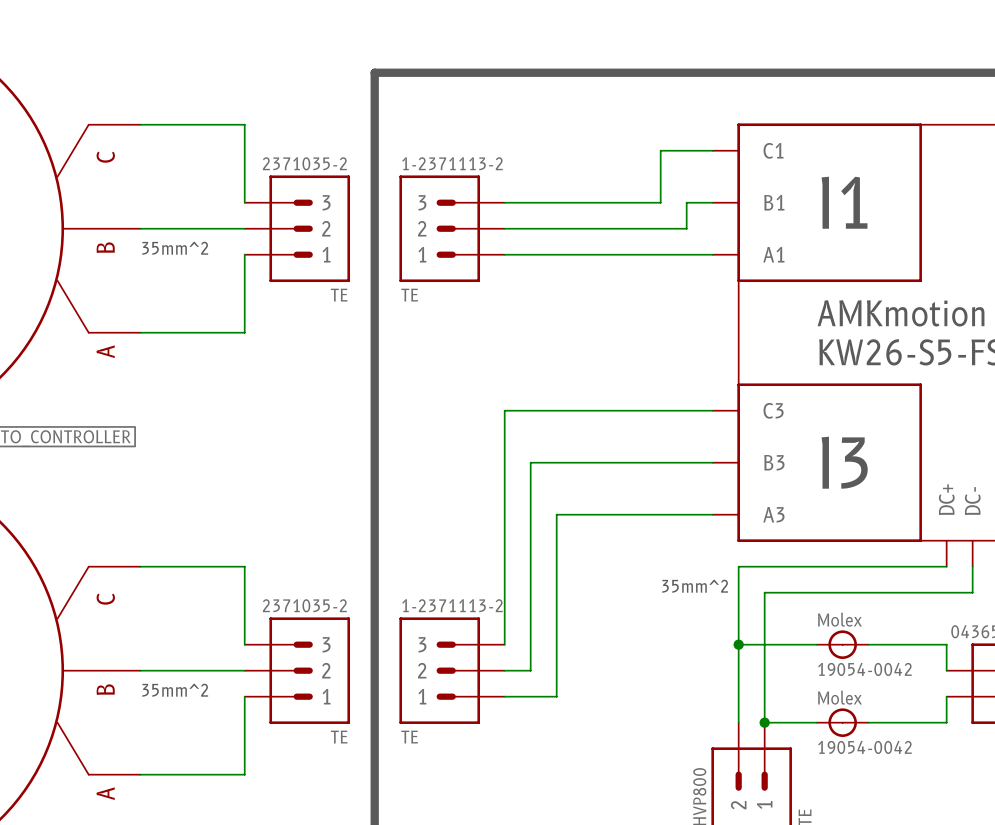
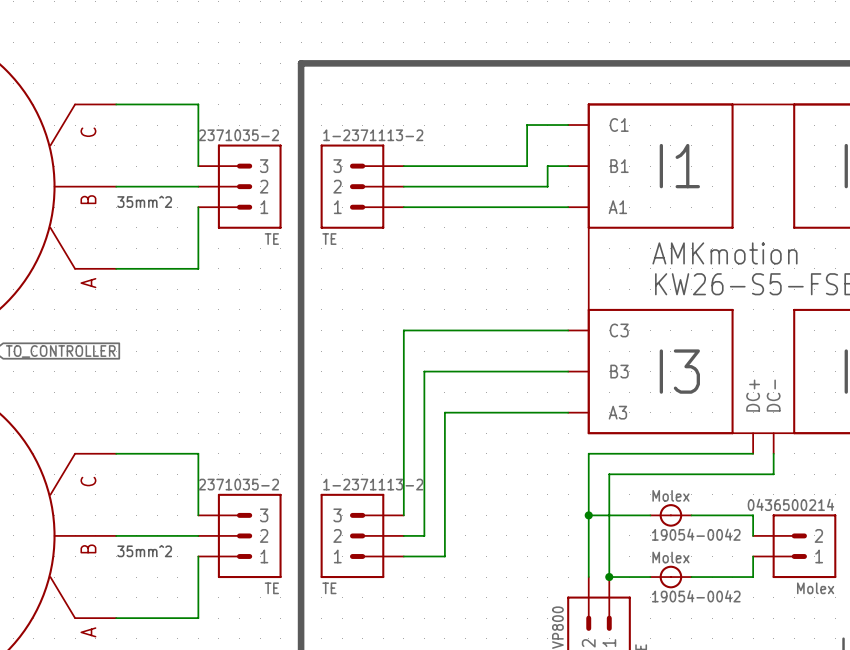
text: 35mm^2 (695, 586) -> none

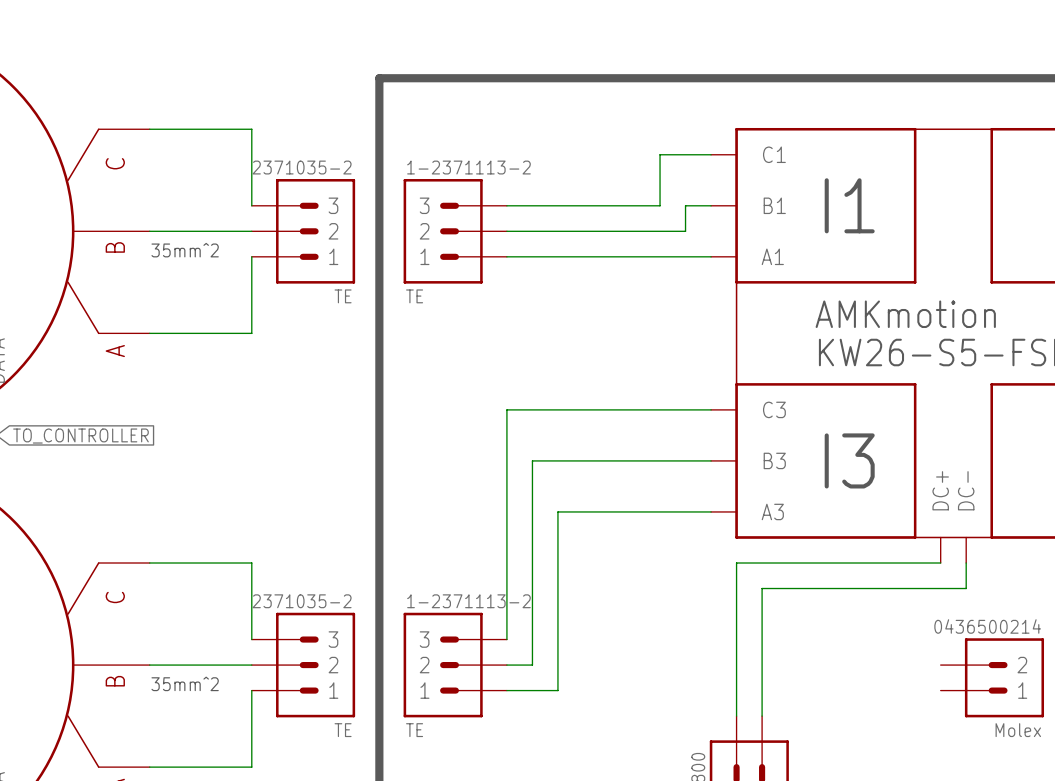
wire: (588, 515) (650, 515) -> none
junction: (588, 515) -> none
part: (670, 515) -> none
wire: (691, 515) (753, 515) (753, 535) -> none
wire: (753, 556) (753, 577) (691, 577) -> none
wire: (609, 577) (650, 577) -> none
junction: (609, 577) -> none
part: (670, 577) -> none

